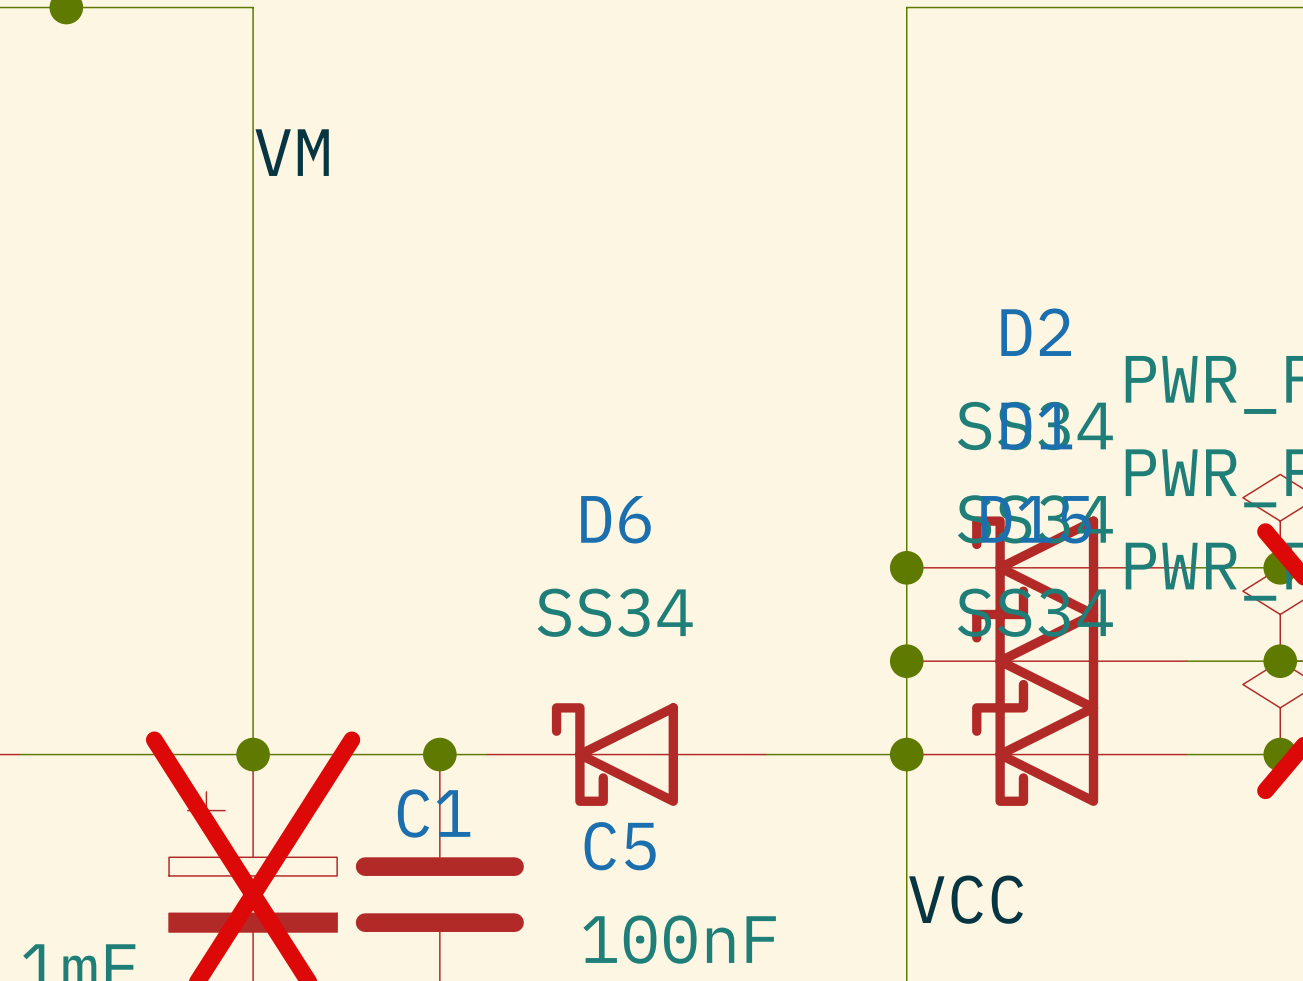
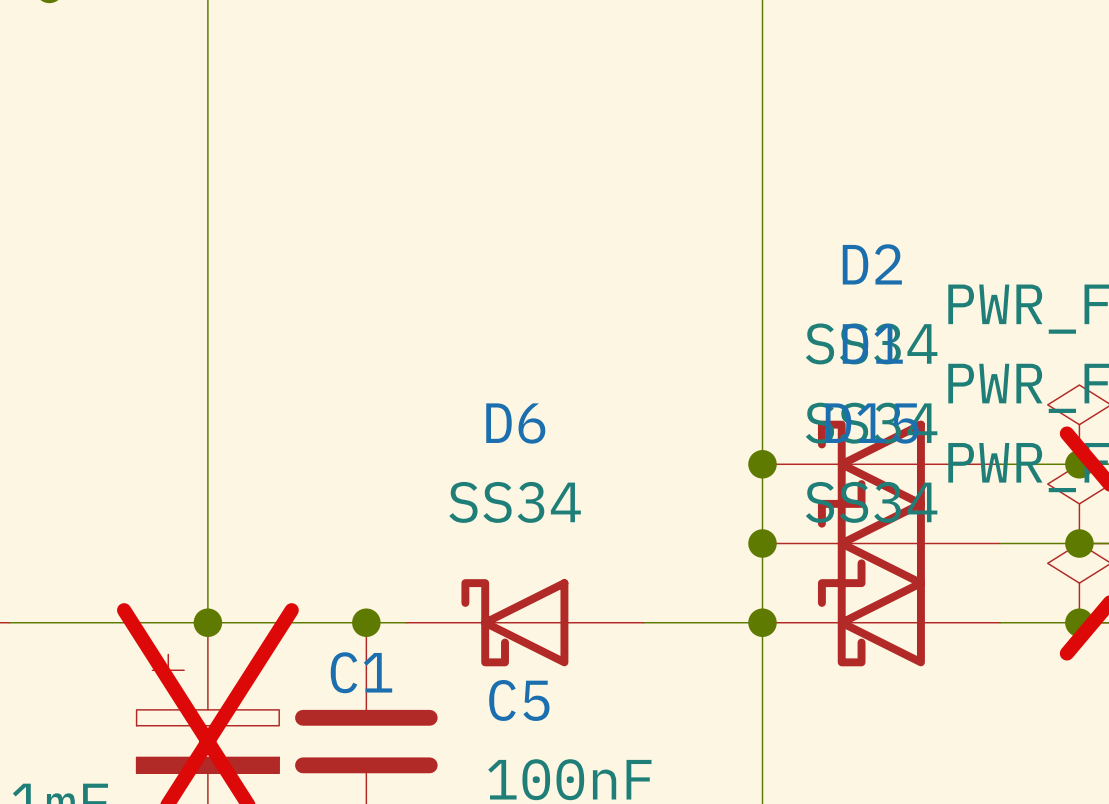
label: VM (292, 152) -> none
label: VCC (966, 899) -> none

